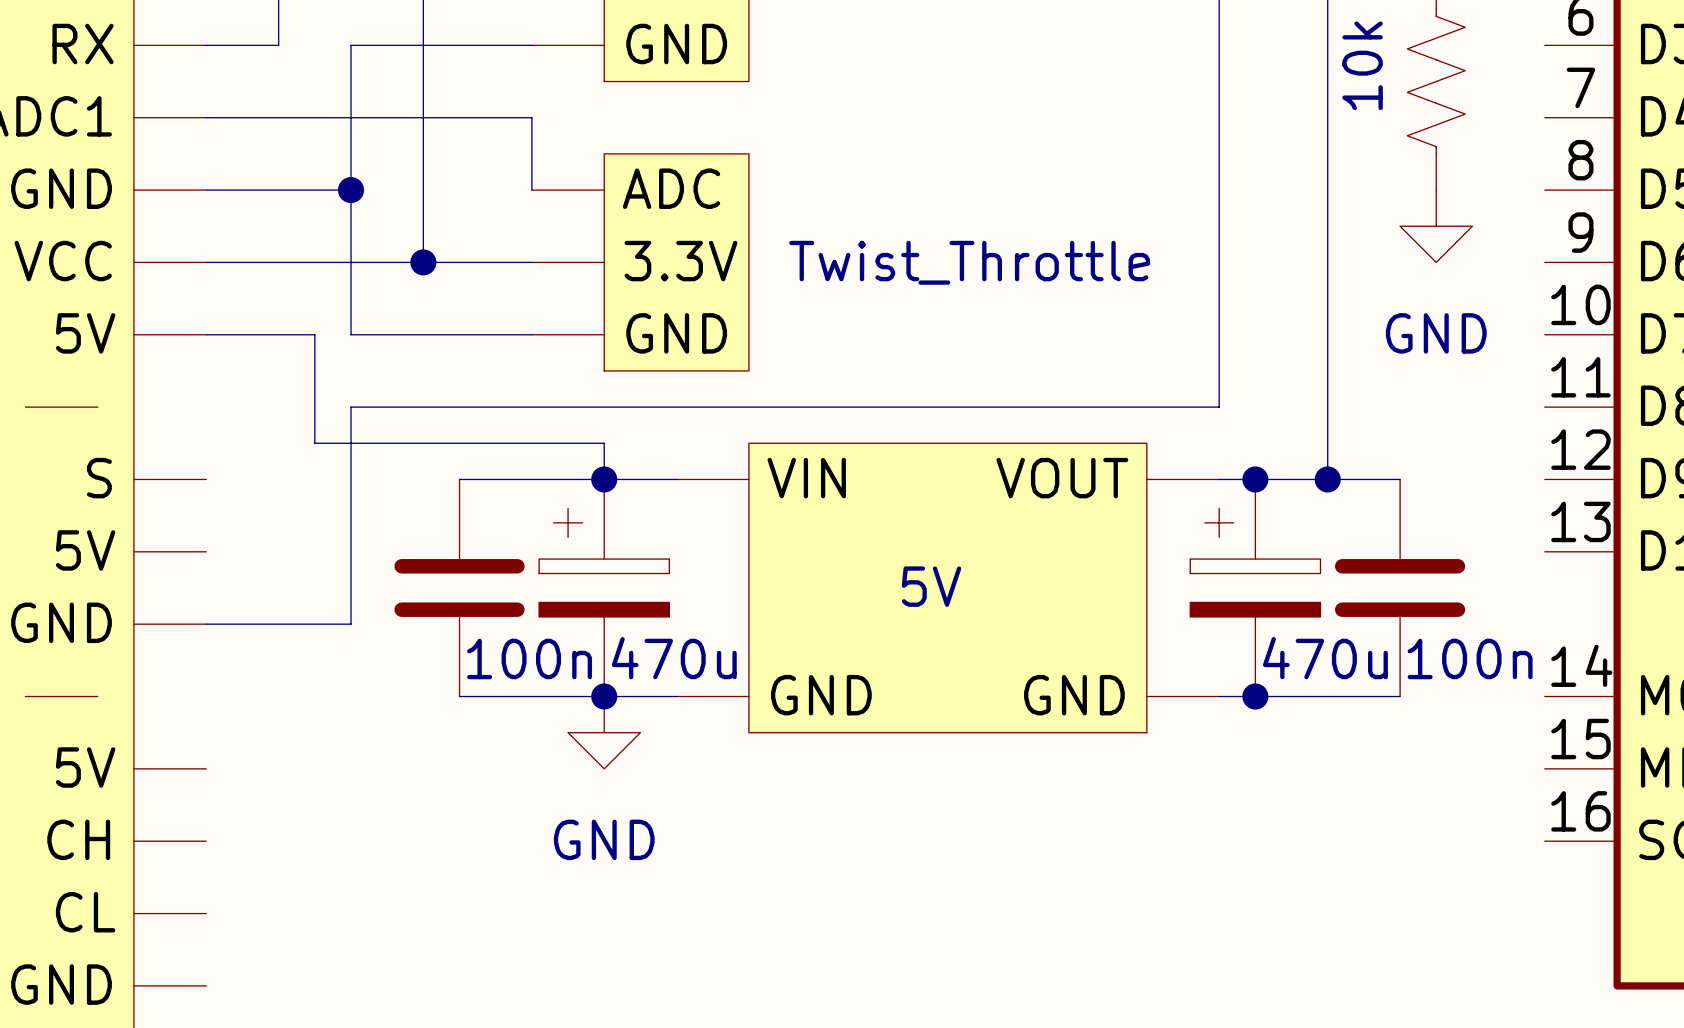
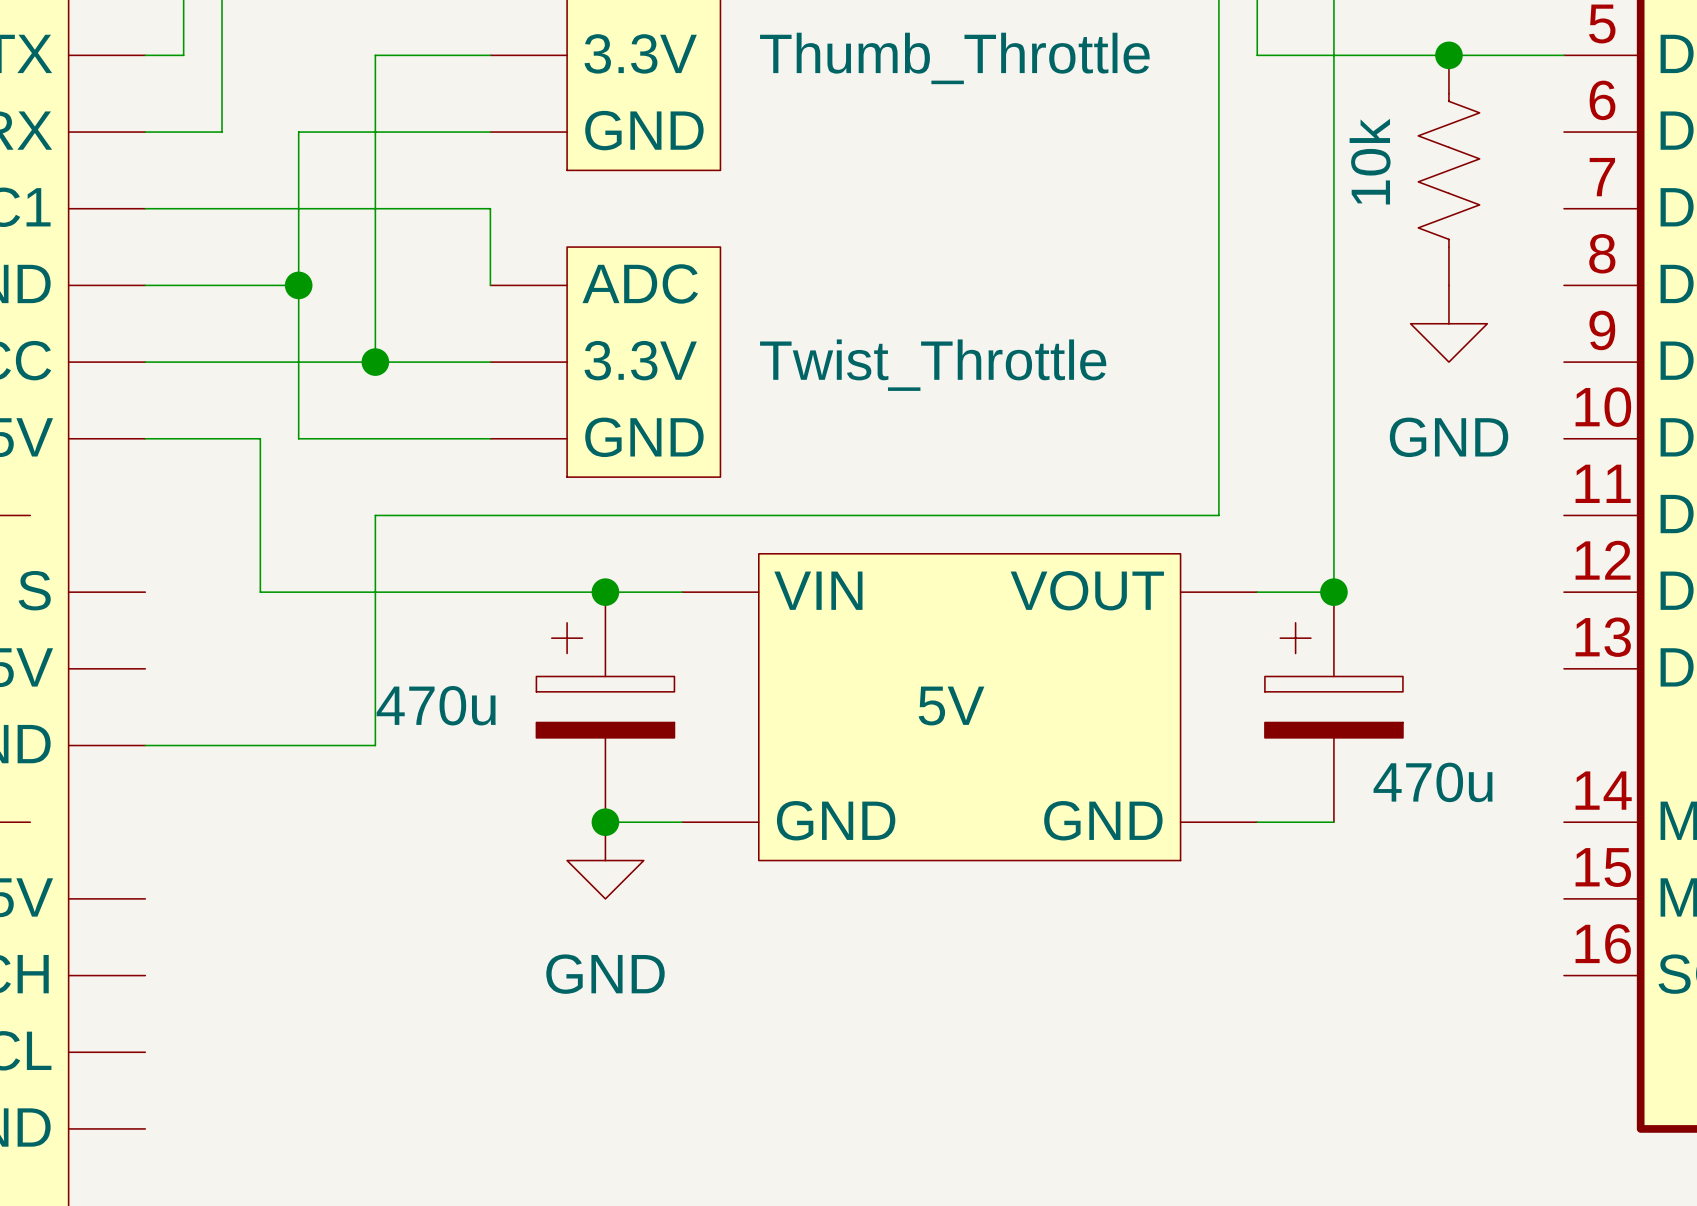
wire: (423, 407) (351, 407) (351, 624) -> (375, 515) (375, 745) (298, 745)
wire: (314, 443) (604, 443) (604, 479) -> (260, 553) (260, 592) (413, 592)
junction position: (604, 479) -> (605, 592)
junction: (1255, 479) -> none
wire: (1327, 479) (1400, 479) -> none
part: 100n (459, 587) -> none
part position: (604, 587) -> (605, 707)
5V position: (947, 587) -> (969, 707)
part position: (1255, 587) -> (1333, 707)
part: 100n (1400, 587) -> none
part value position: 470u (674, 658) -> 470u (436, 705)
part value position: 470u (1325, 658) -> 470u (1433, 782)
wire: (459, 696) (640, 696) -> none
junction position: (604, 696) -> (605, 822)
junction: (1255, 696) -> none
wire: (1327, 696) (1400, 696) -> none
power symbol position: GND (604, 732) -> GND (605, 860)

